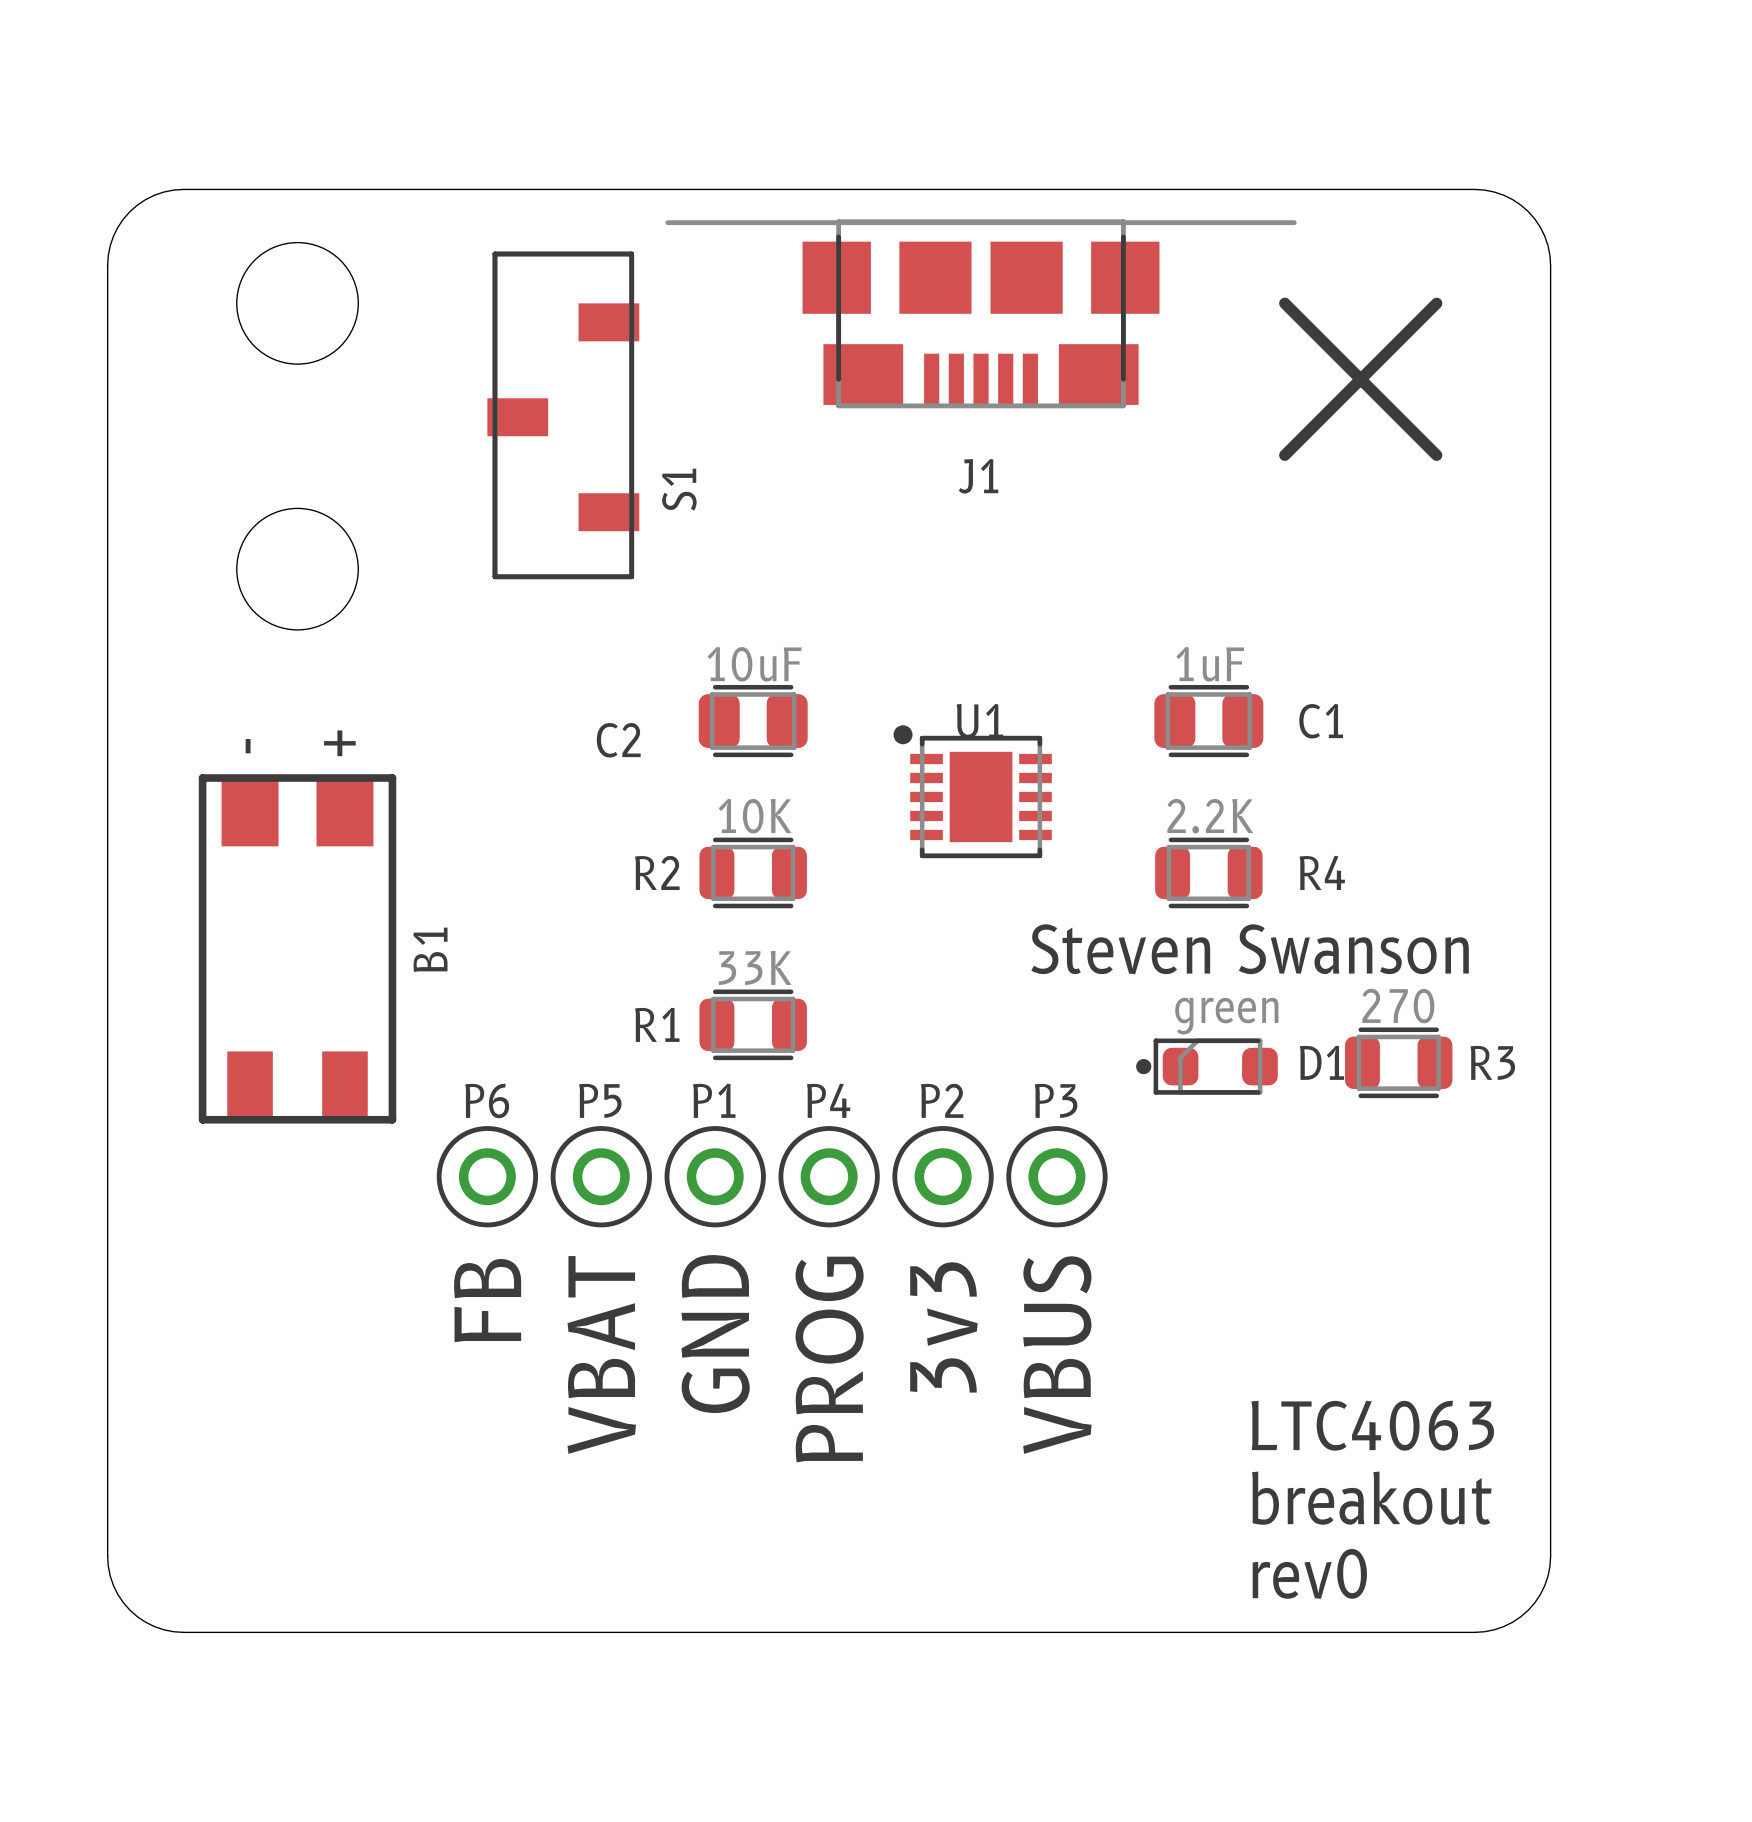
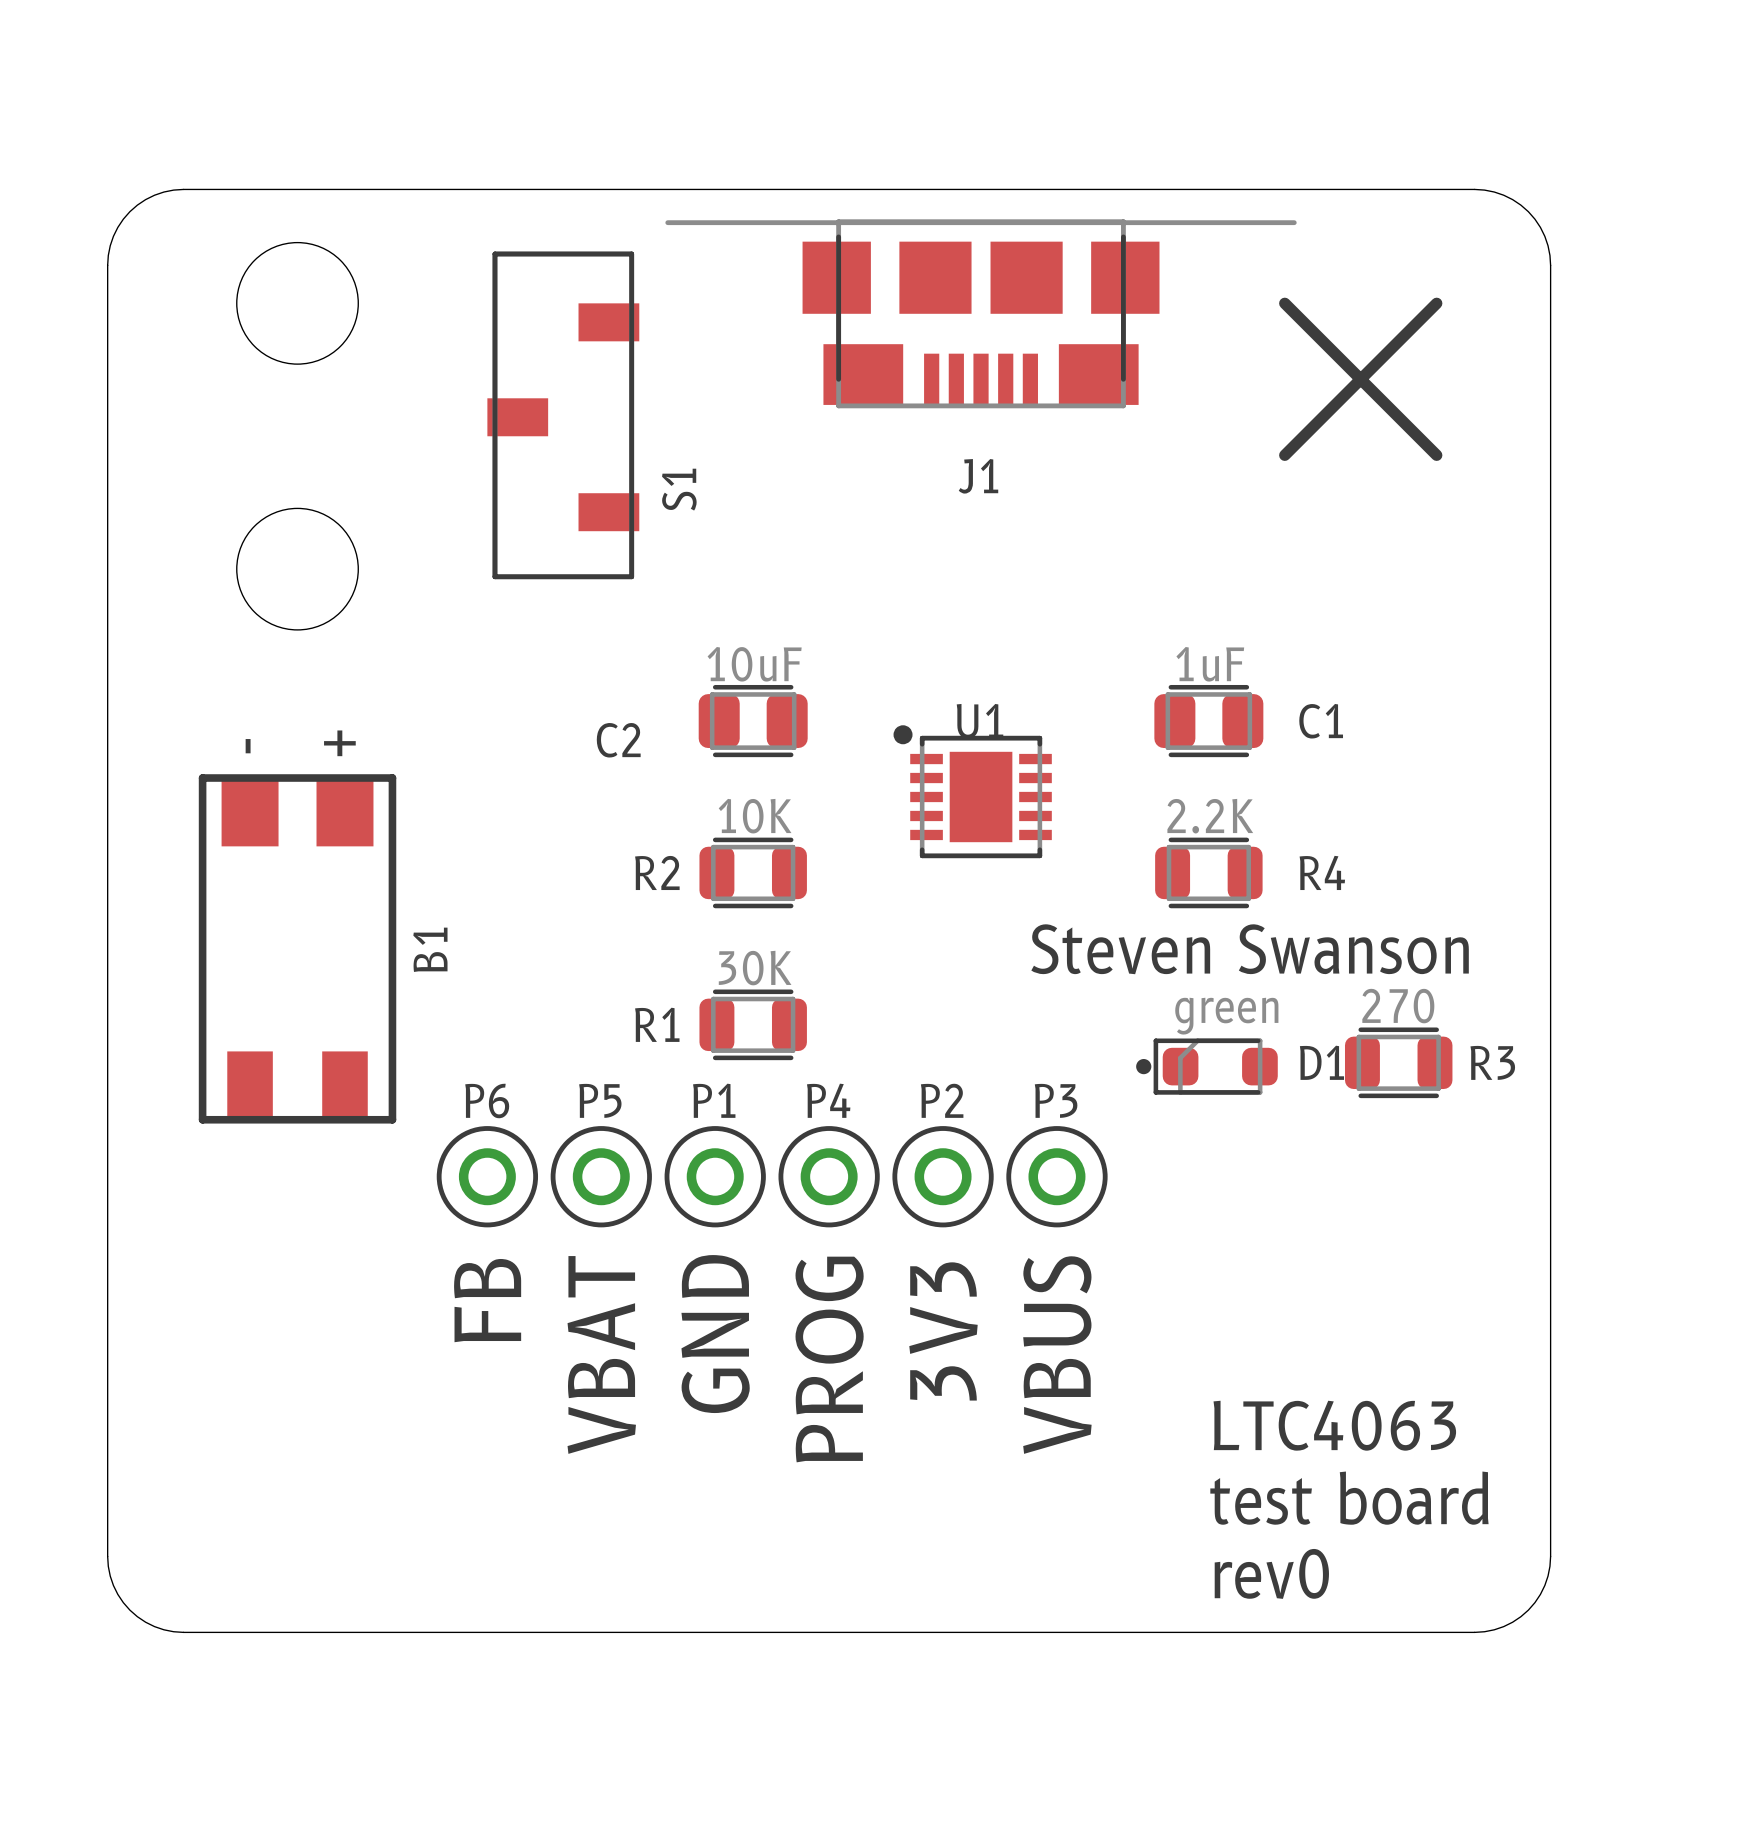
R1 value: 33K (755, 967) -> 30K (755, 968)
text: 3v3 (943, 1327) -> 3V3 (943, 1331)
text position: LTC4063 (1372, 1425) -> LTC4063 (1334, 1425)
text: breakout (1371, 1498) -> test board (1349, 1498)
text position: rev0 (1309, 1573) -> rev0 (1271, 1573)

